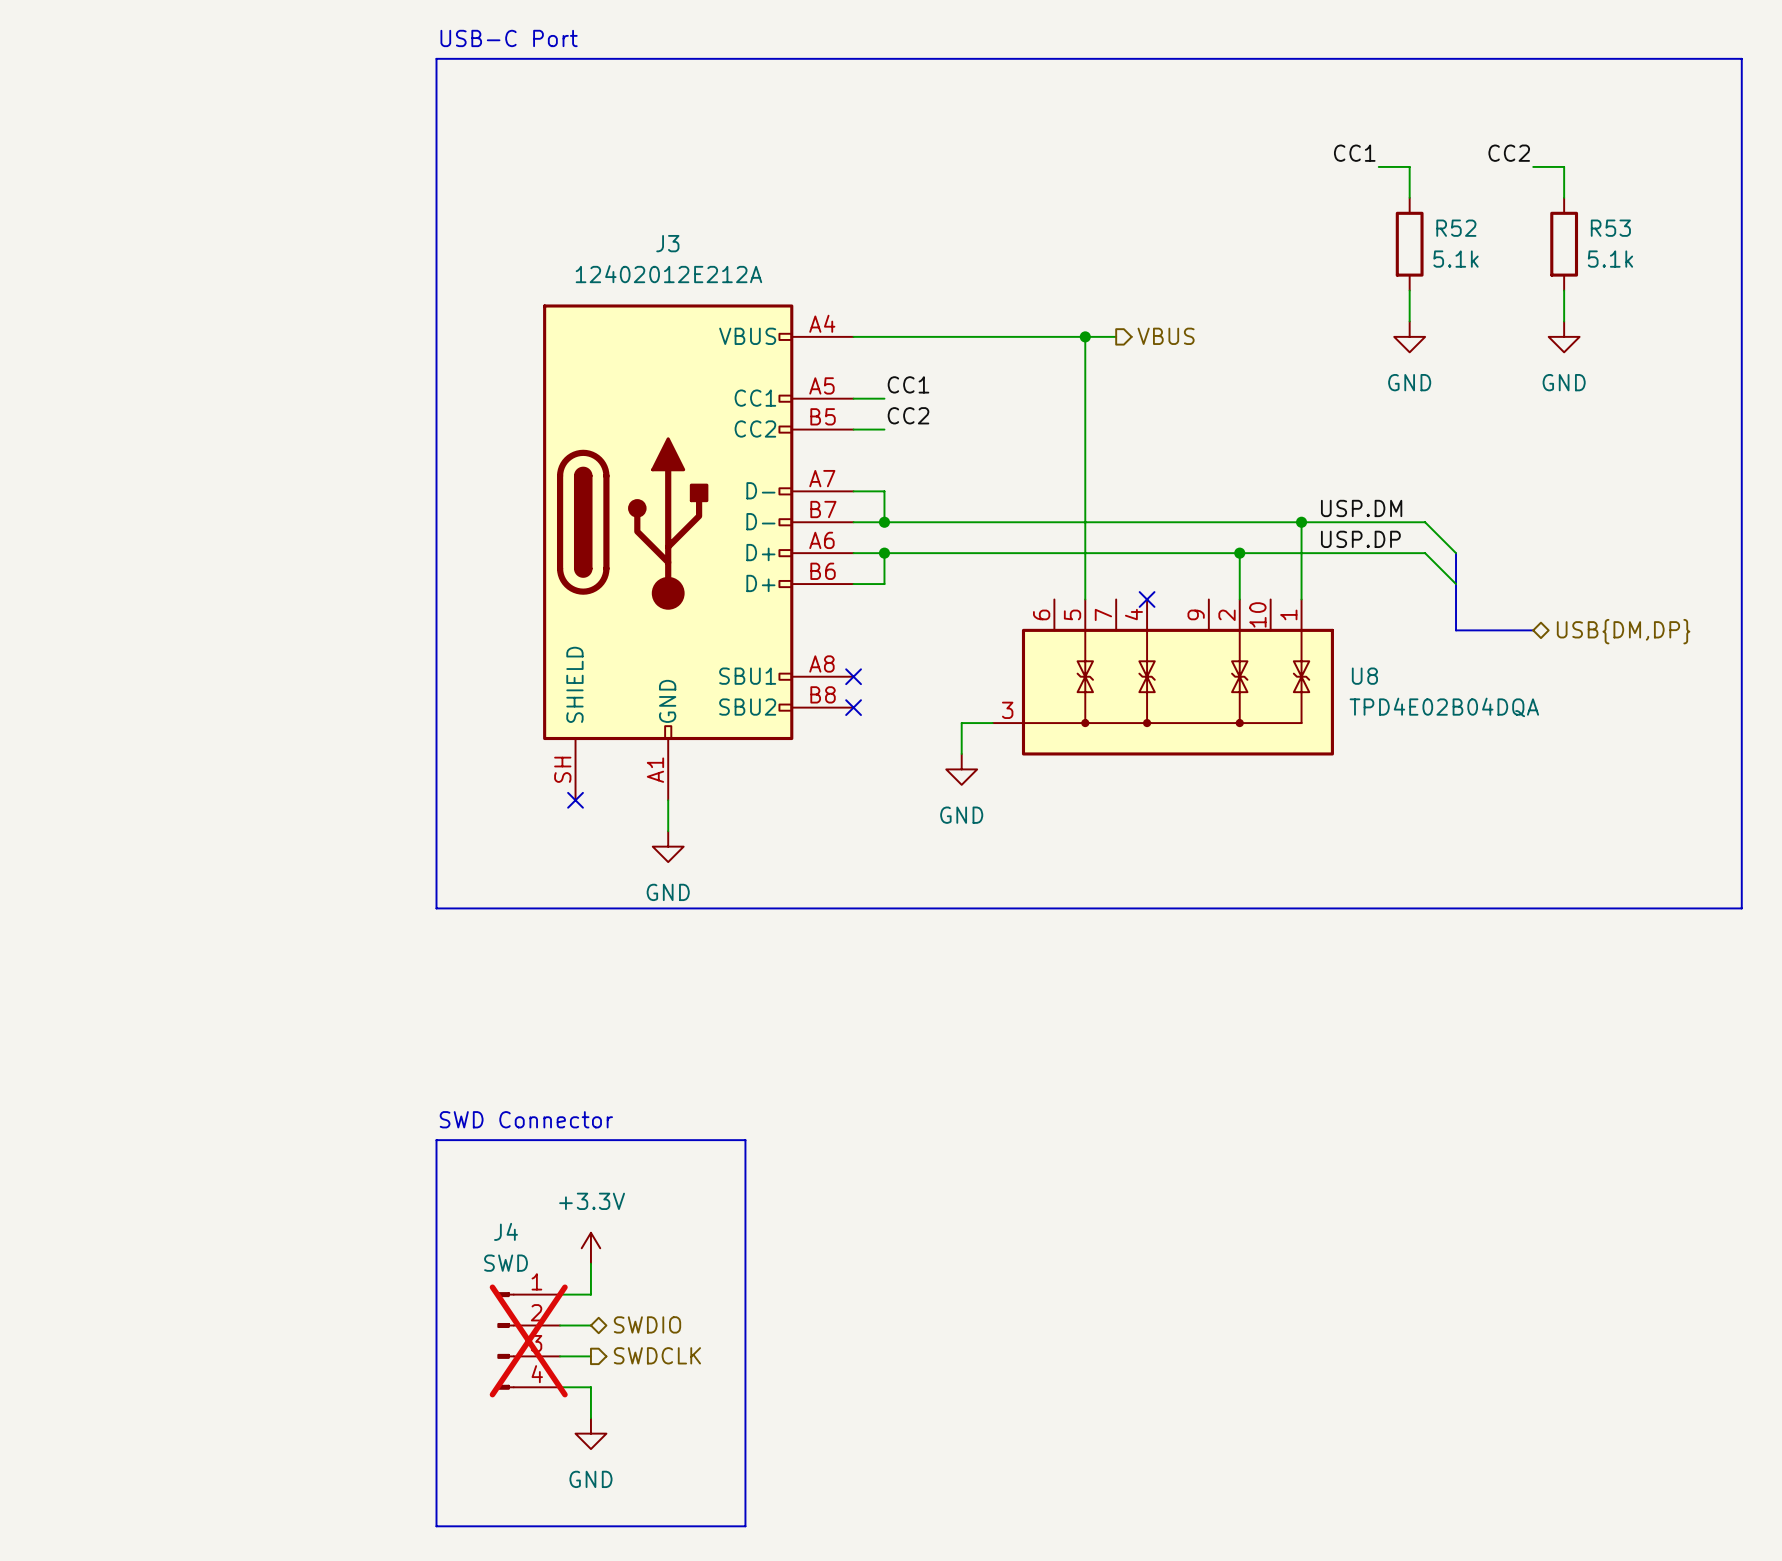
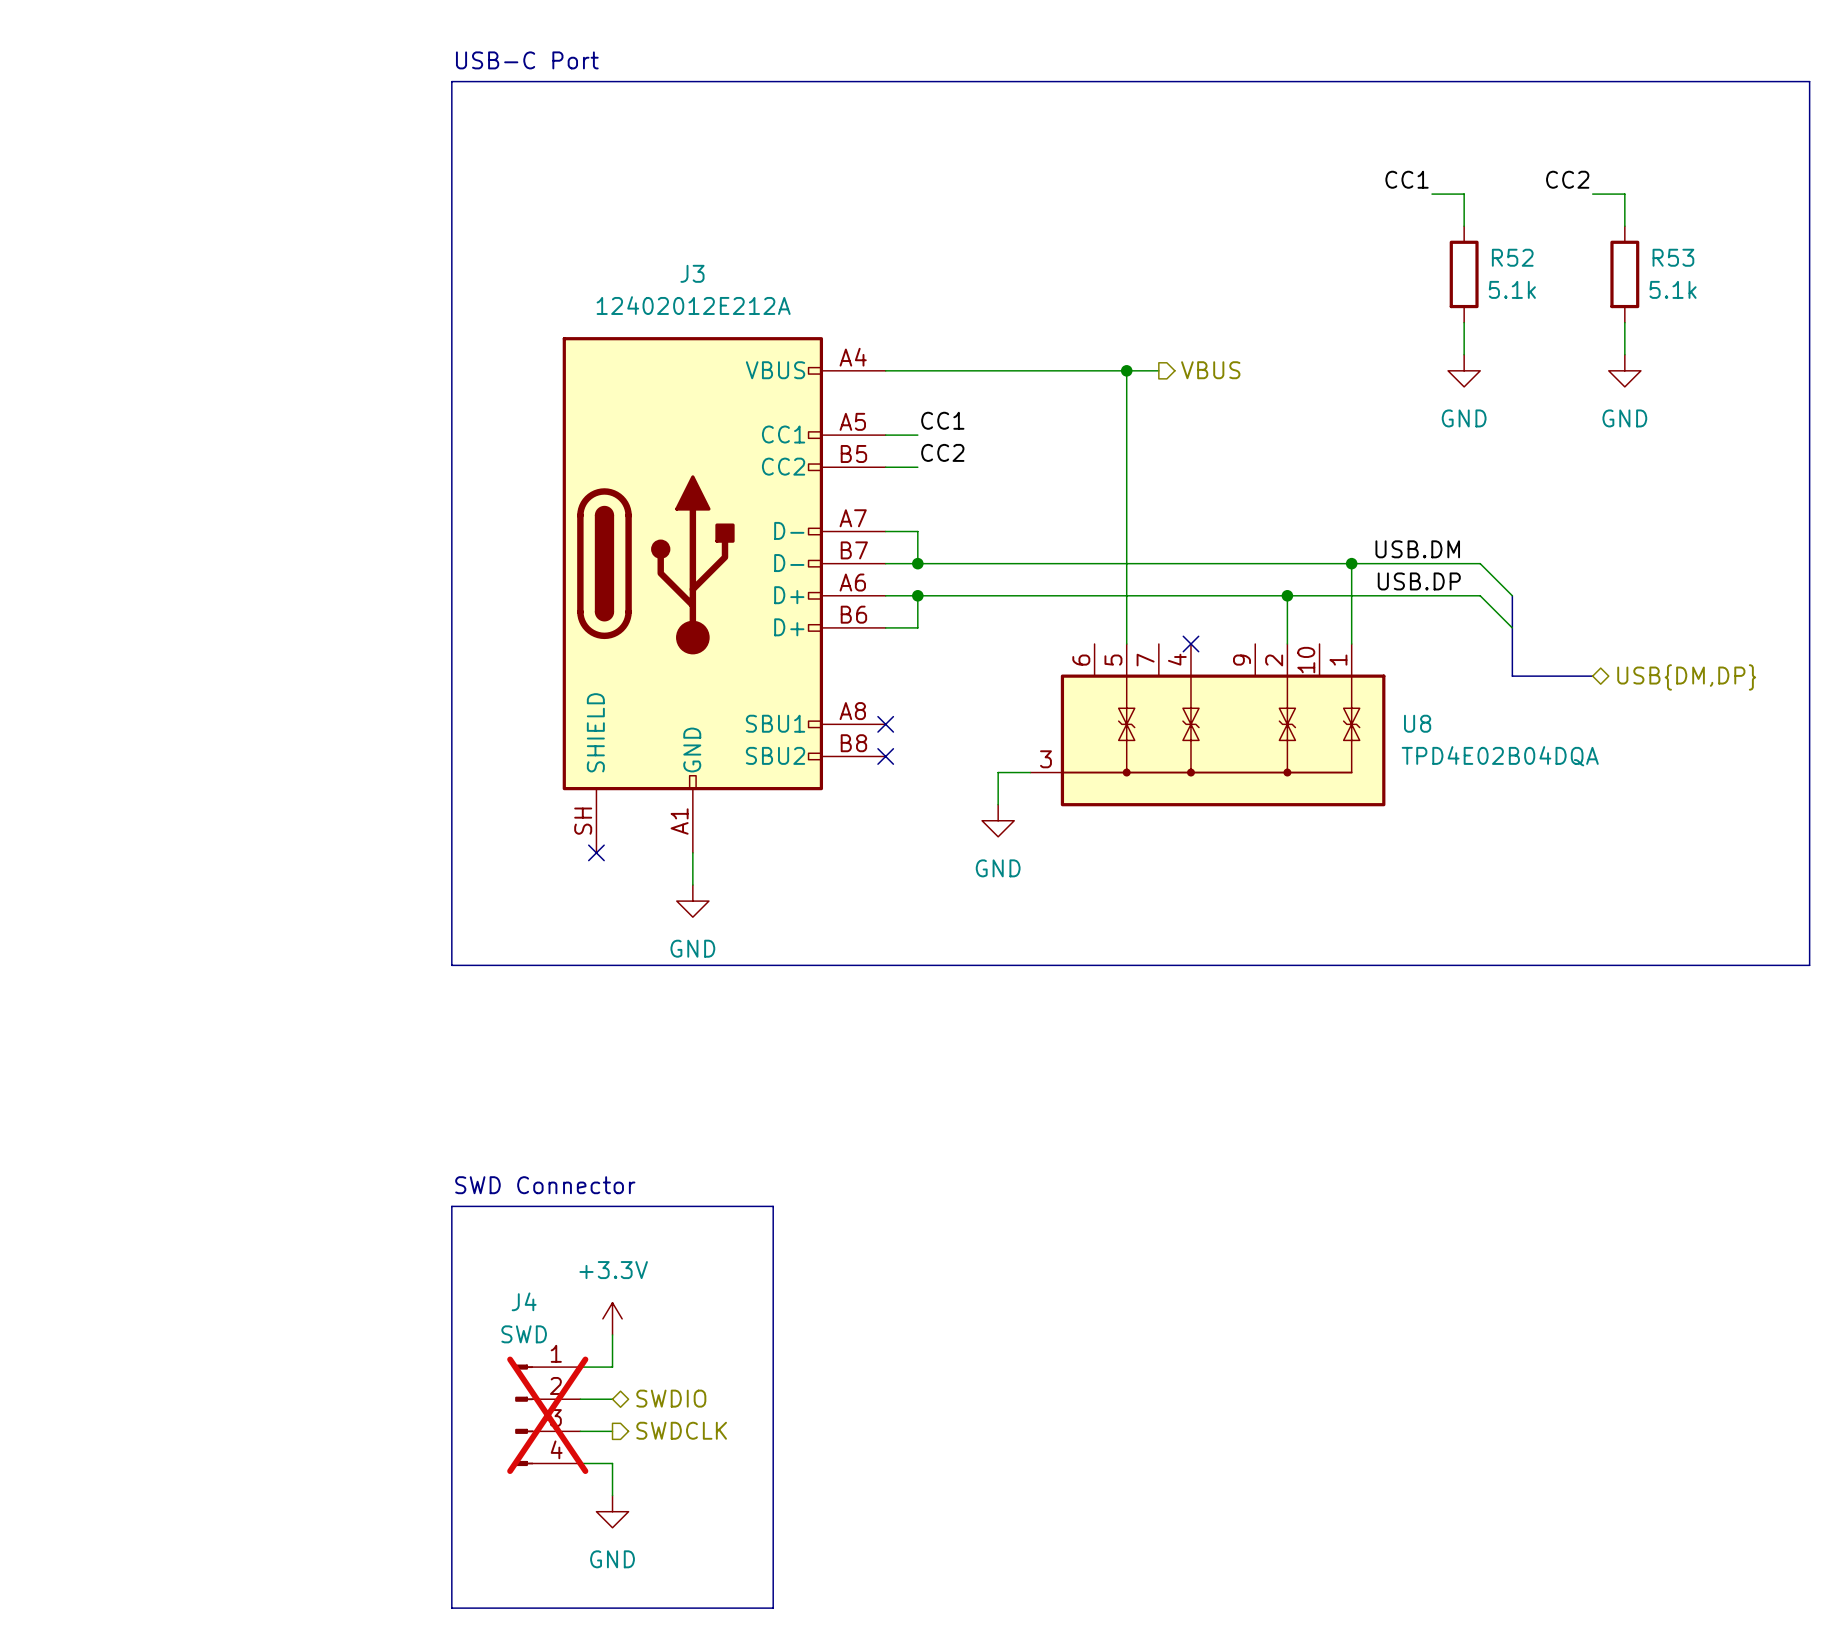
label: USP.DM (1361, 508) -> none
label: none -> USB.DM (1417, 549)
label: USP.DP (1360, 539) -> none
label: none -> USB.DP (1419, 581)

